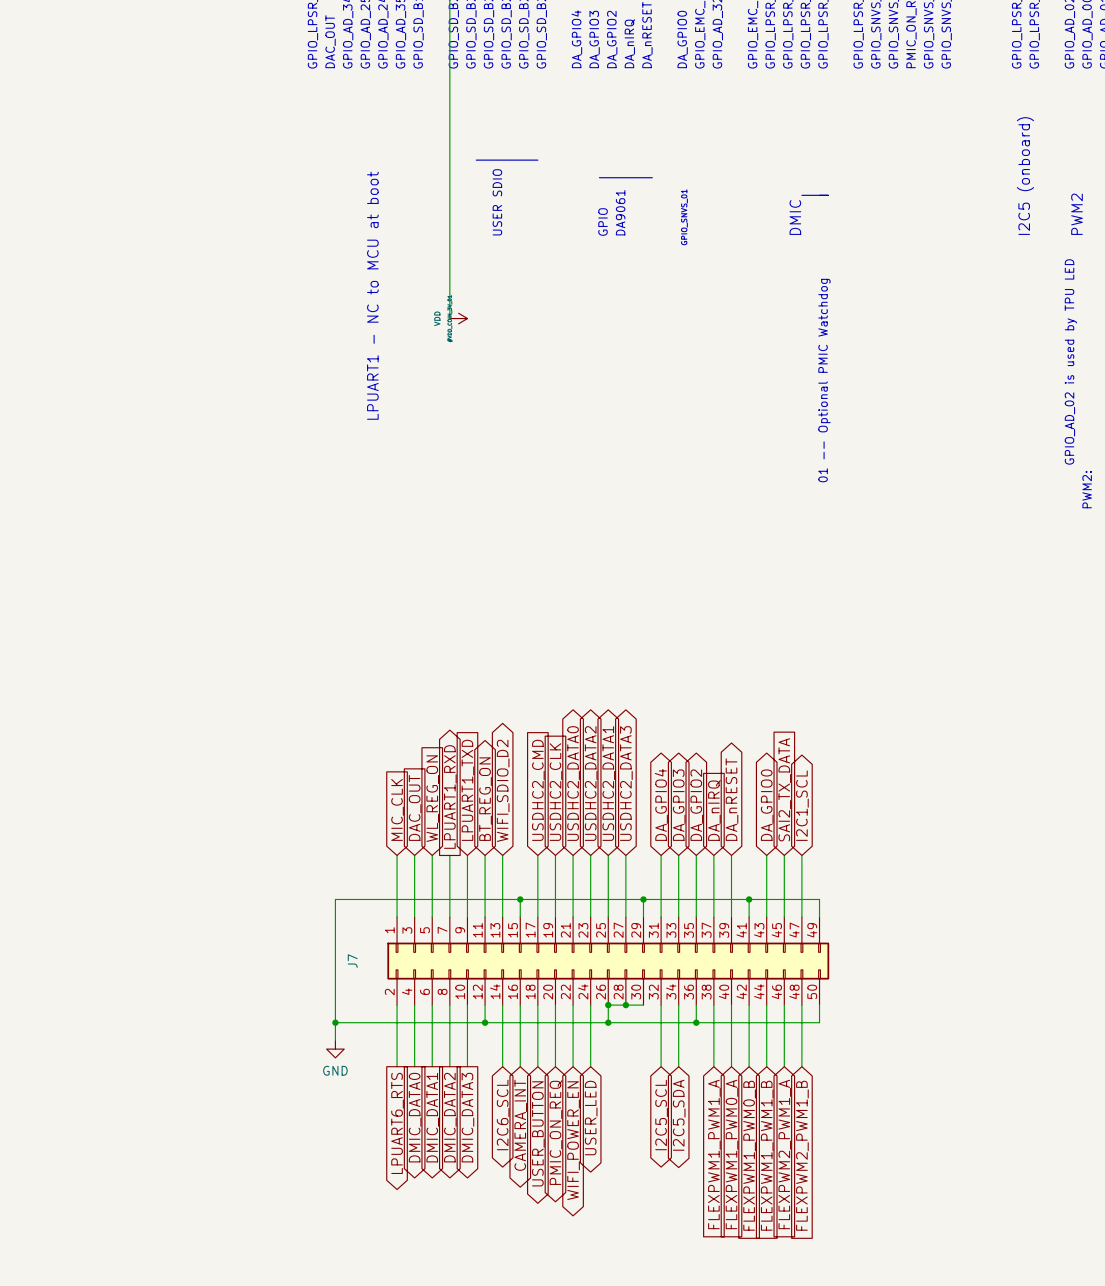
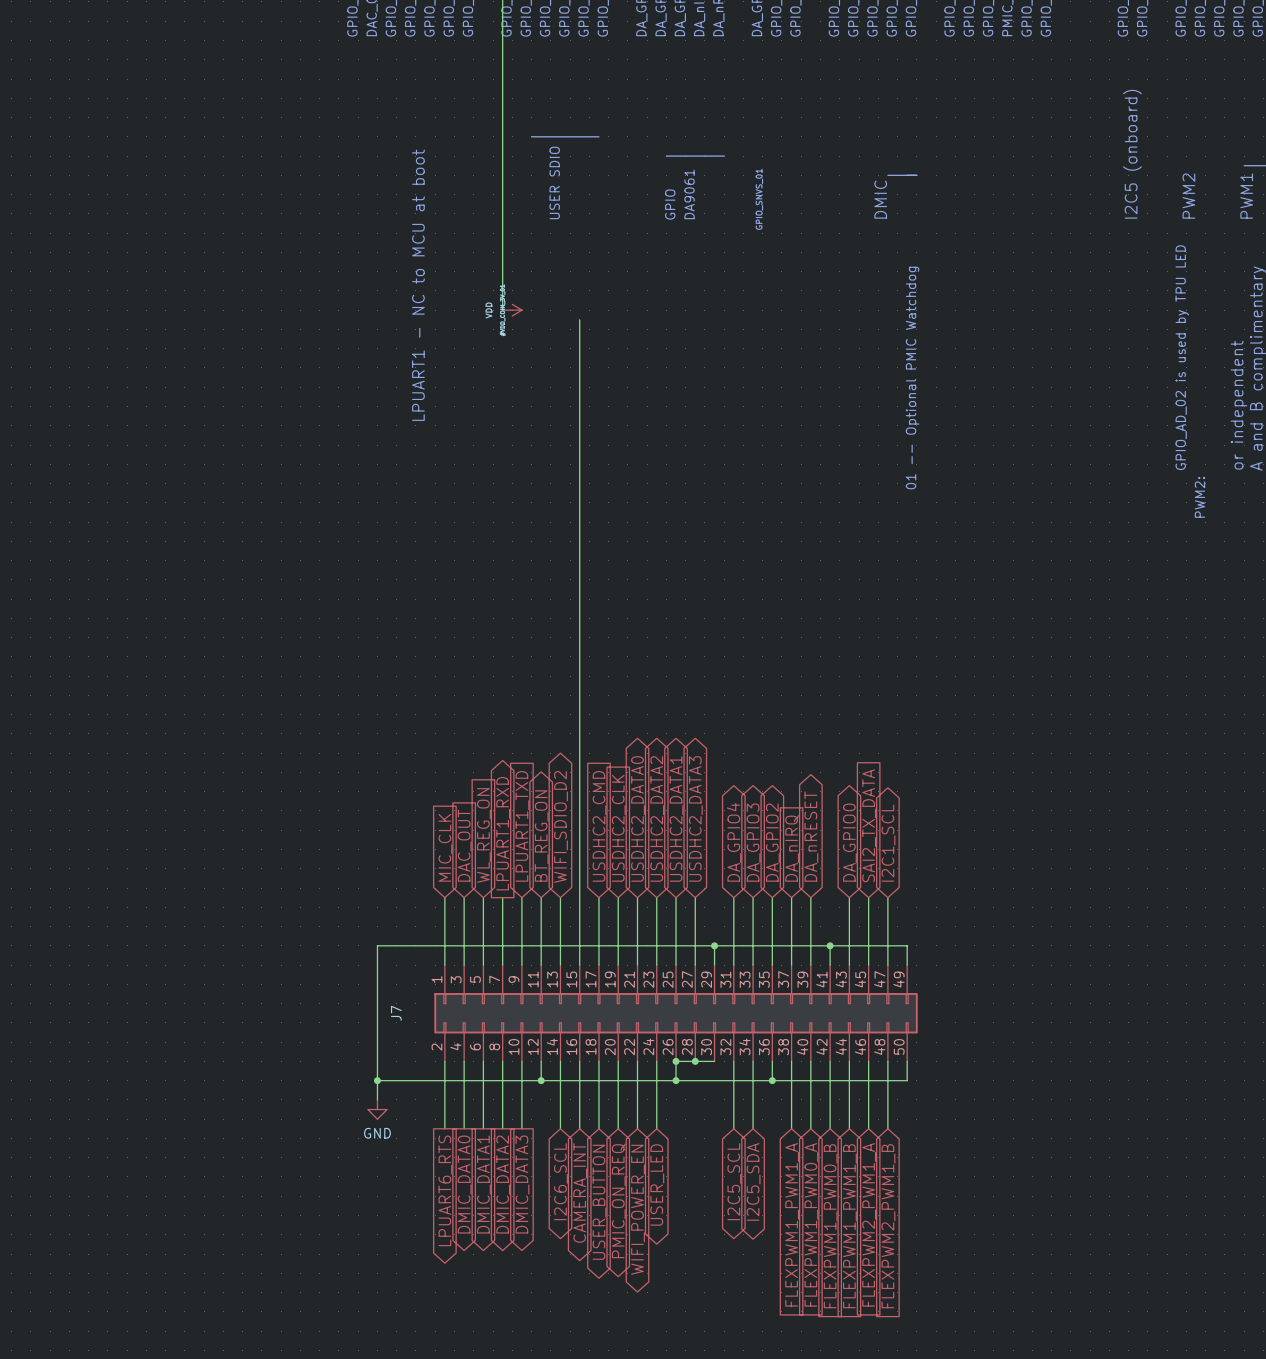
wire: none -> (579, 319) (579, 945)
junction: (520, 899) -> none

